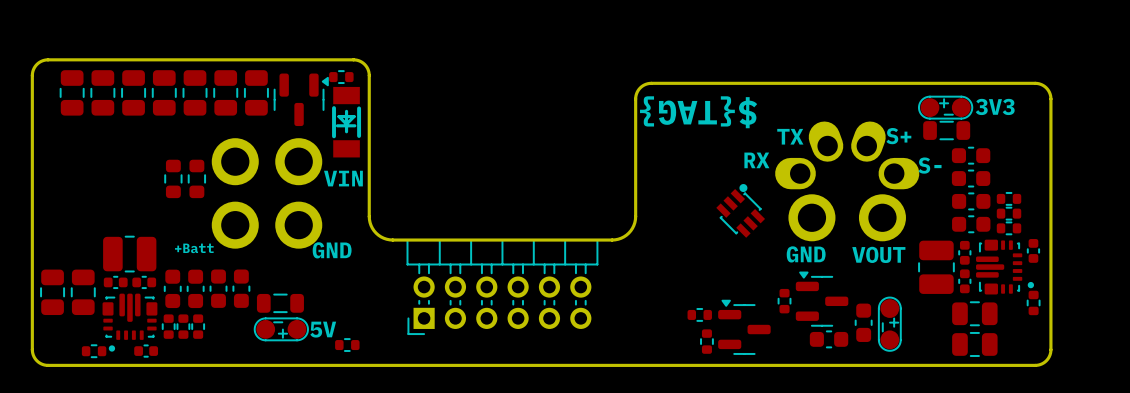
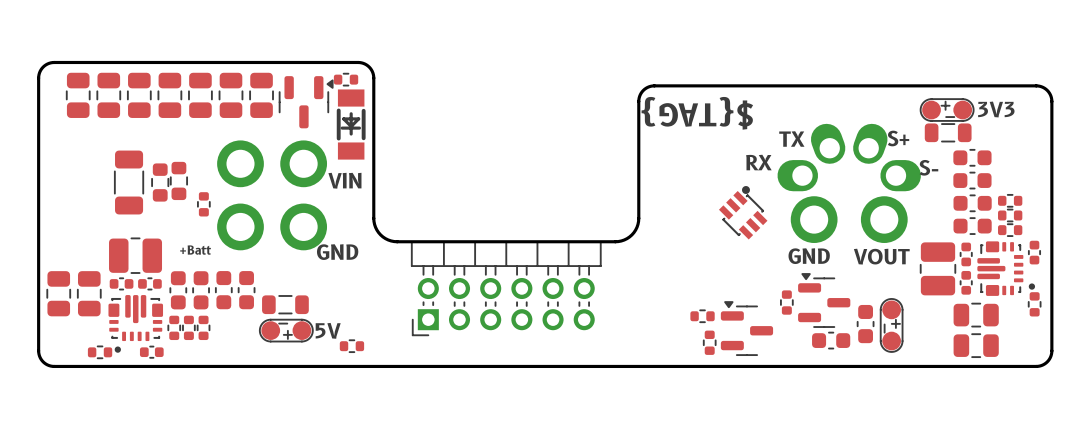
part position: (196, 178) -> (160, 182)
part: none -> (129, 182)
part: none -> (203, 204)

